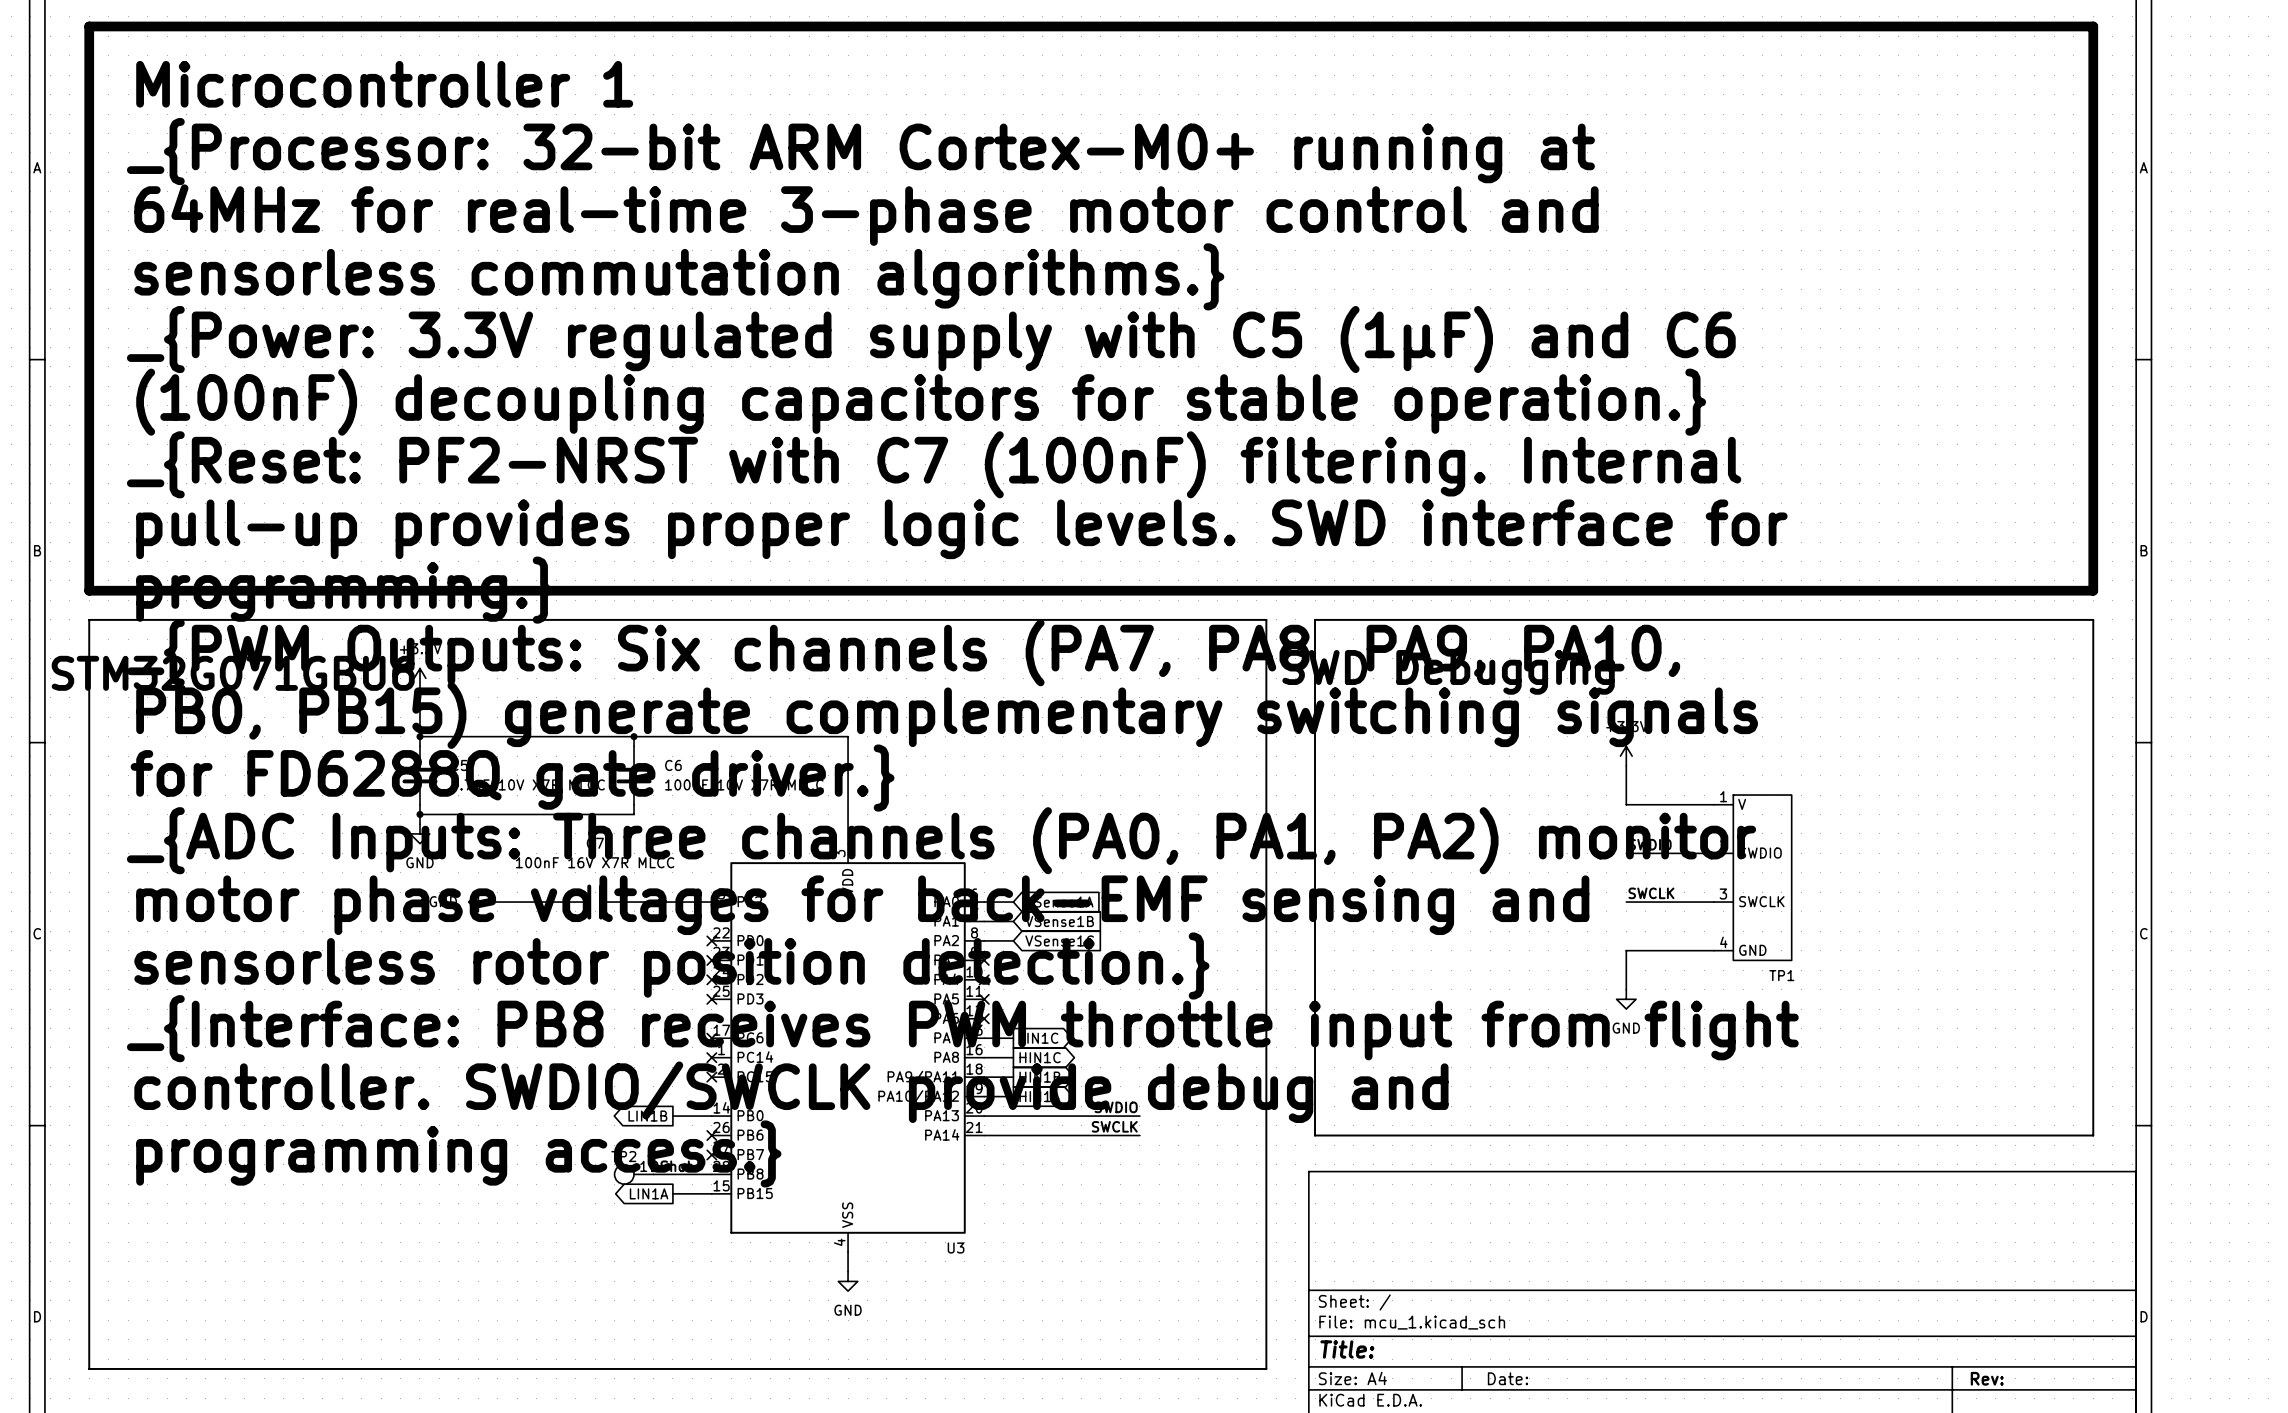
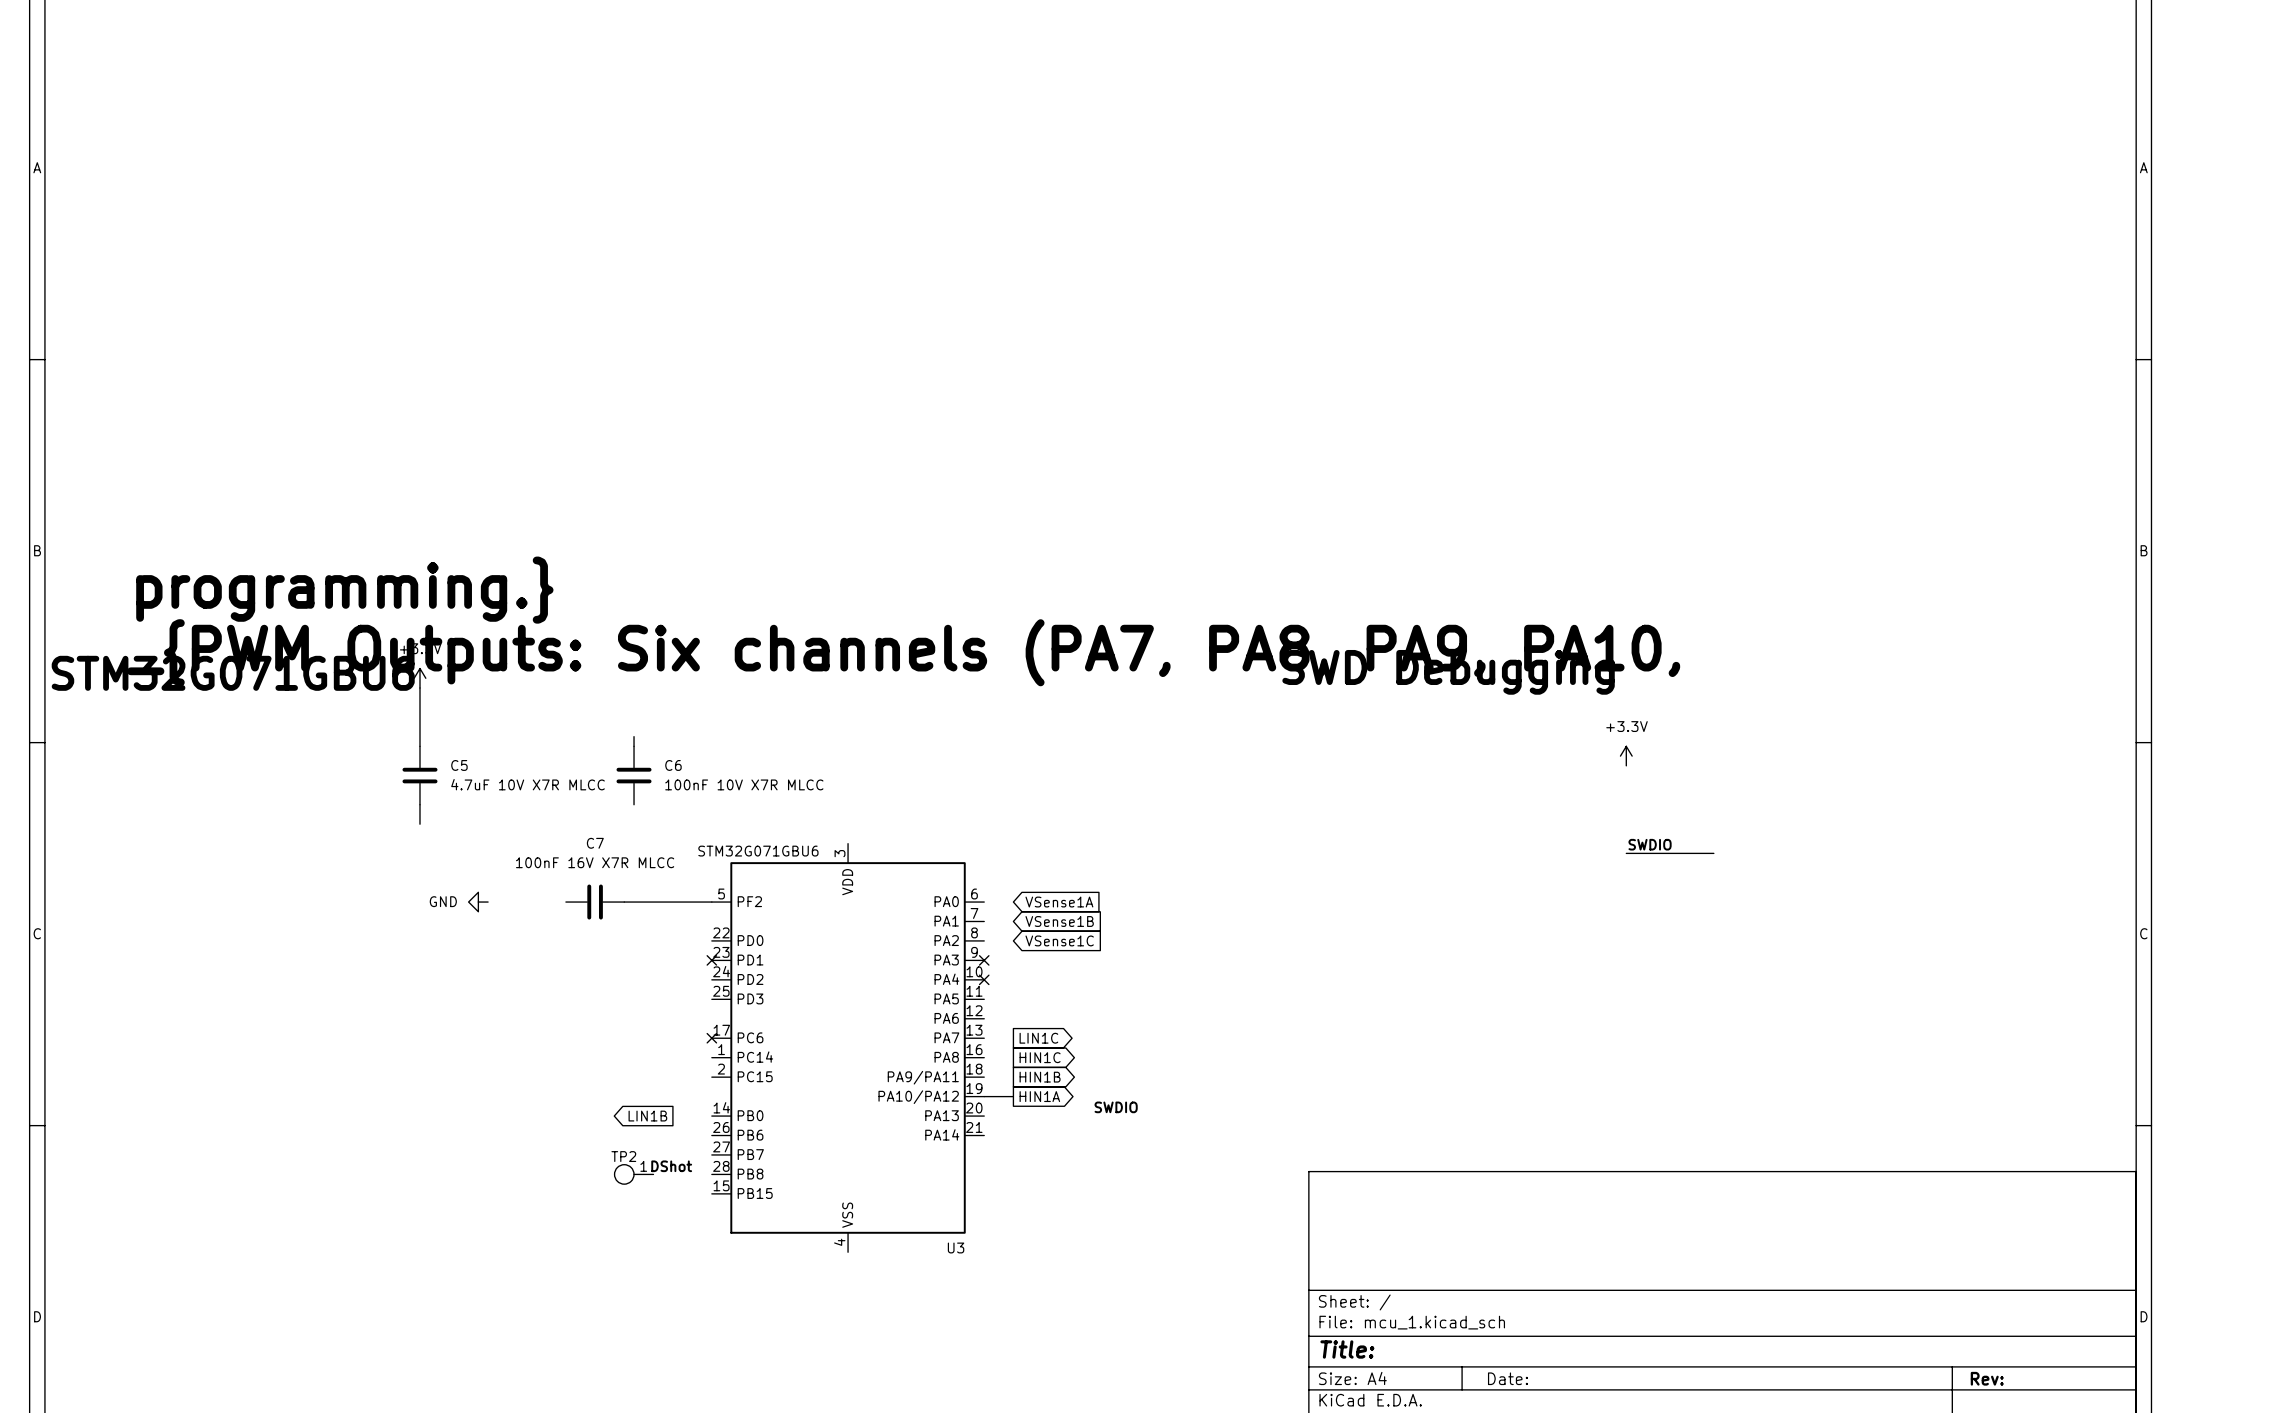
line: (89, 26) (2093, 26) (2093, 590) (89, 590) (89, 26) -> none
text: Microcontroller 1 (384, 84) -> none
text: _{Processor: 32-bit ARM Cortex-M0+ running at (860, 151) -> none
text: 64MHz for real-time 3-phase motor control and (866, 215) -> none
text: sensorless commutation algorithms.} (679, 276) -> none
text: _{Power: 3.3V regulated supply with C5 (1µF) and C6 (931, 339) -> none
text: (100nF) decoupling capacitors for stable operation.} (921, 402) -> none
text: _{Reset: PF2-NRST with C7 (100nF) filtering. Internal (934, 464) -> none
text: pull-up provides proper logic levels. SWD interface for (961, 529) -> none
line: (89, 619) (1266, 619) (1266, 1368) (89, 1368) (89, 619) -> none
line: (1315, 619) (2093, 619) (2093, 1135) (1315, 1135) (1315, 619) -> none
text: PB0, PB15) generate complementary switching signals (947, 715) -> none
wire: (419, 736) (848, 736) (848, 843) -> none
junction: (419, 736) -> none
junction: (634, 736) -> none
wire: (1626, 765) (1626, 804) (1713, 804) -> none
text: for FD6288Q gate driver.} (512, 778) -> none
wire: (634, 804) (634, 814) (419, 814) -> none
junction: (419, 814) -> none
power symbol: GND (419, 833) -> none
text: _{ADC Inputs: Three channels (PA0, PA1, PA2) monitor (941, 840) -> none
U3 value: none -> STM32G071GBU6 (758, 851)
TP1: (1752, 877) -> none
label: SWCLK (1651, 893) -> none
wire: (488, 902) (565, 902) -> none
wire: (984, 902) (1013, 902) -> none
wire: (1626, 902) (1713, 902) -> none
text: motor phase voltages for back-EMF sensing and (862, 905) -> none
wire: (984, 921) (1013, 921) -> none
no-connect mark: (711, 940) -> none
wire: (984, 940) (1013, 940) -> none
wire: (1713, 950) (1626, 950) (1626, 989) -> none
text: sensorless rotor position detection.} (671, 966) -> none
no-connect mark: (711, 979) -> none
no-connect mark: (711, 999) -> none
no-connect mark: (984, 999) -> none
power symbol: GND (1626, 999) -> none
no-connect mark: (984, 1018) -> none
text: _{Interface: PB8 receives PWM throttle input from flight (962, 1028) -> none
wire: (984, 1038) (1013, 1038) -> none
no-connect mark: (711, 1057) -> none
wire: (984, 1057) (1013, 1057) -> none
no-connect mark: (711, 1077) -> none
wire: (984, 1077) (1013, 1077) -> none
text: controller. SWDIO/SWCLK provide debug and (791, 1092) -> none
wire: (672, 1116) (711, 1116) -> none
wire: (984, 1116) (1139, 1116) -> none
label: SWCLK (1114, 1126) -> none
no-connect mark: (711, 1135) -> none
wire: (984, 1135) (1139, 1135) -> none
text: programming access.} (458, 1153) -> none
no-connect mark: (711, 1154) -> none
wire: (653, 1174) (711, 1174) -> none
global label: LIN1A (649, 1193) -> none
wire: (672, 1193) (711, 1193) -> none
wire: (848, 1252) (848, 1271) -> none
power symbol: GND (848, 1281) -> none

